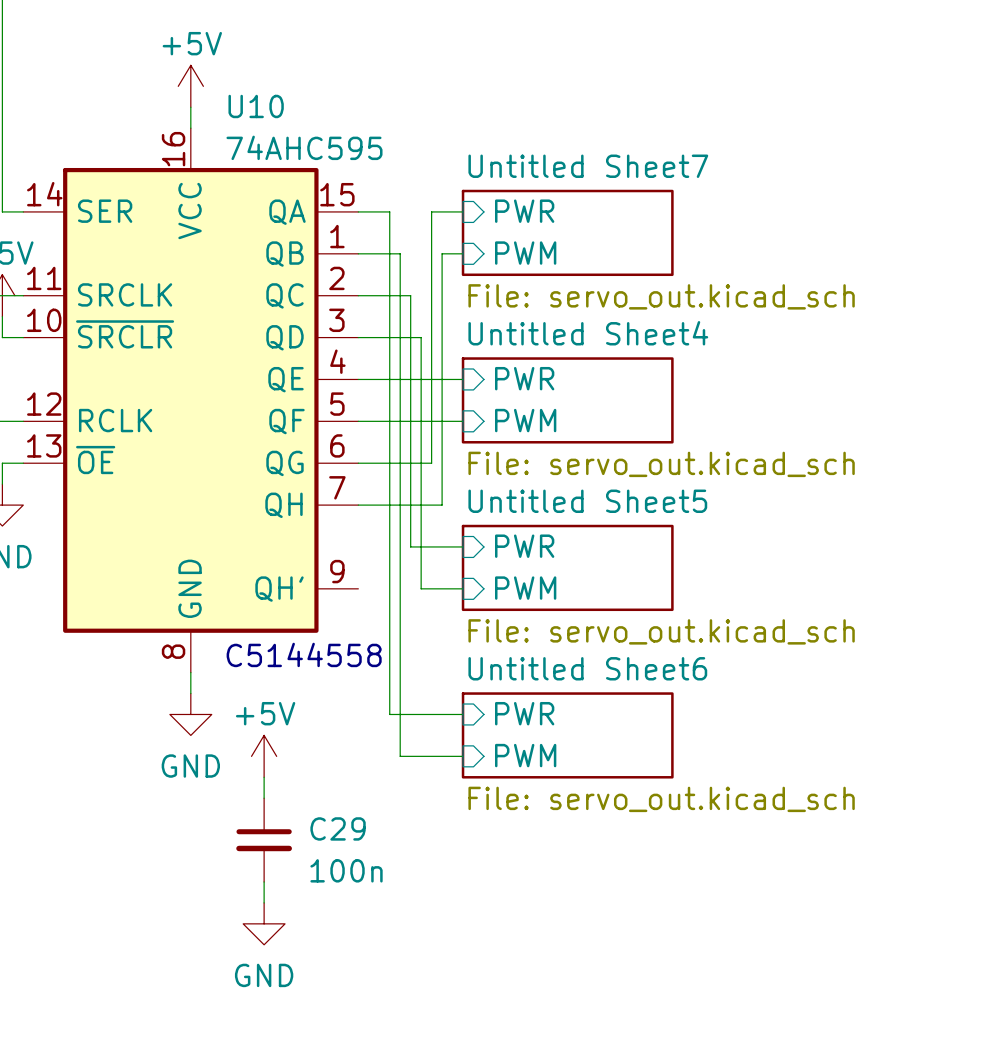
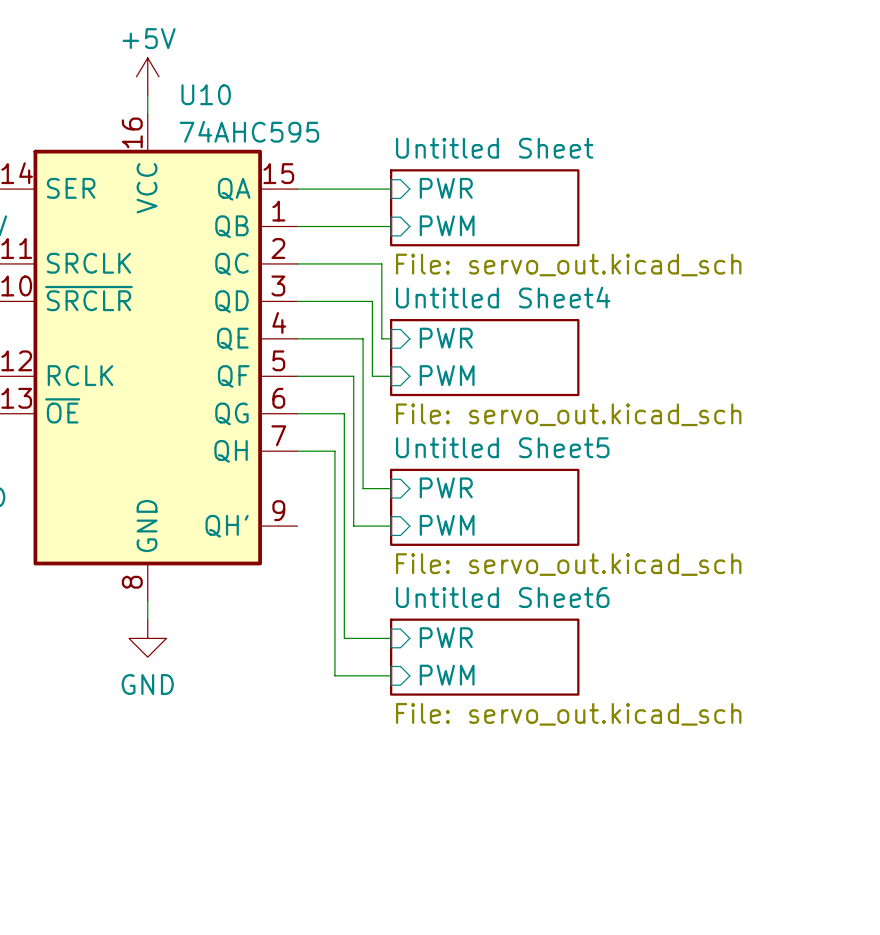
sheet Untitled Sheet7 name: Untitled Sheet7 (588, 166) -> Untitled Sheet (494, 148)
wire: (389, 211) (389, 714) (410, 714) -> (344, 488) (344, 638)
wire: none -> (325, 189) (363, 189)
wire: (431, 211) (431, 379) (452, 379) -> (344, 263) (381, 263) (381, 338)
wire: (400, 253) (400, 505) (442, 505) (442, 421) (421, 421) (421, 337) -> (334, 226) (372, 226)
wire: (442, 253) (442, 337) -> (353, 301) (372, 301)
wire: (410, 295) (410, 463) (431, 463) -> none
wire: (410, 546) (431, 546) -> (363, 413) (363, 488)
text: C5144558 (304, 654) -> none
power symbol: +5V (264, 756) -> none
wire: (264, 777) (264, 798) -> none
C29: 100n (264, 840) -> none
wire: (264, 881) (264, 902) -> none
power symbol: GND (264, 923) -> none

